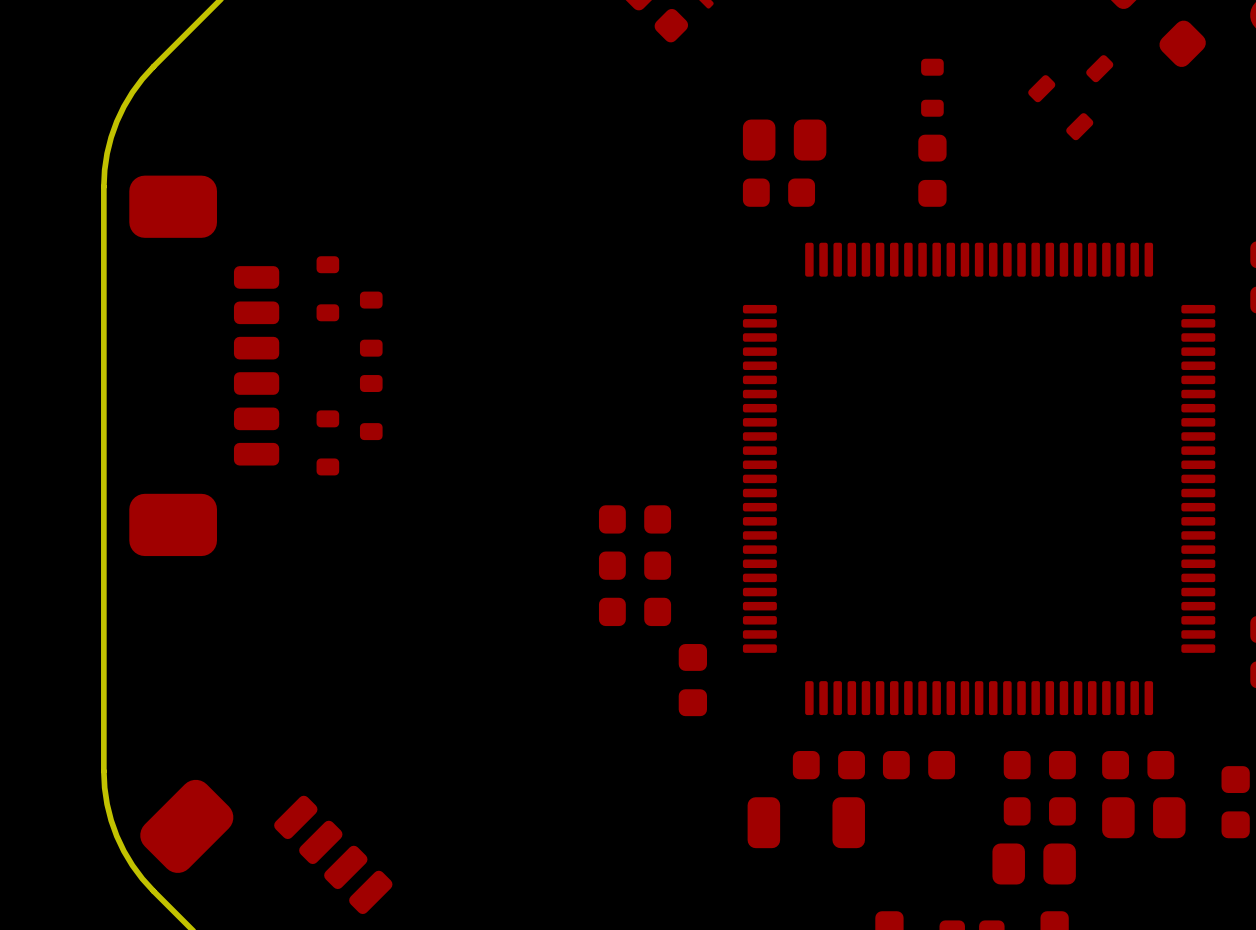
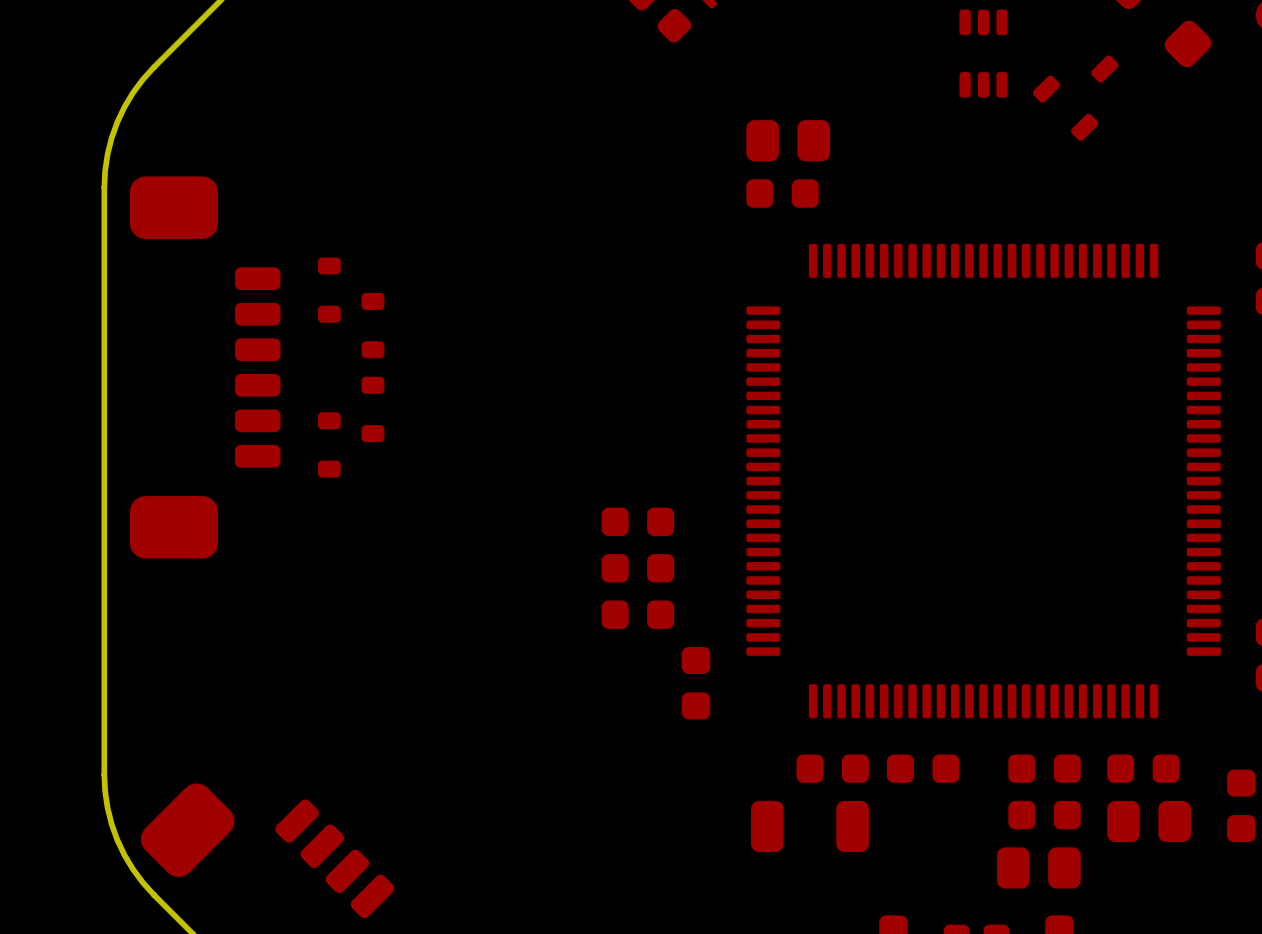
part: none -> (983, 53)
part: (932, 87) -> none
part: (932, 170) -> none

